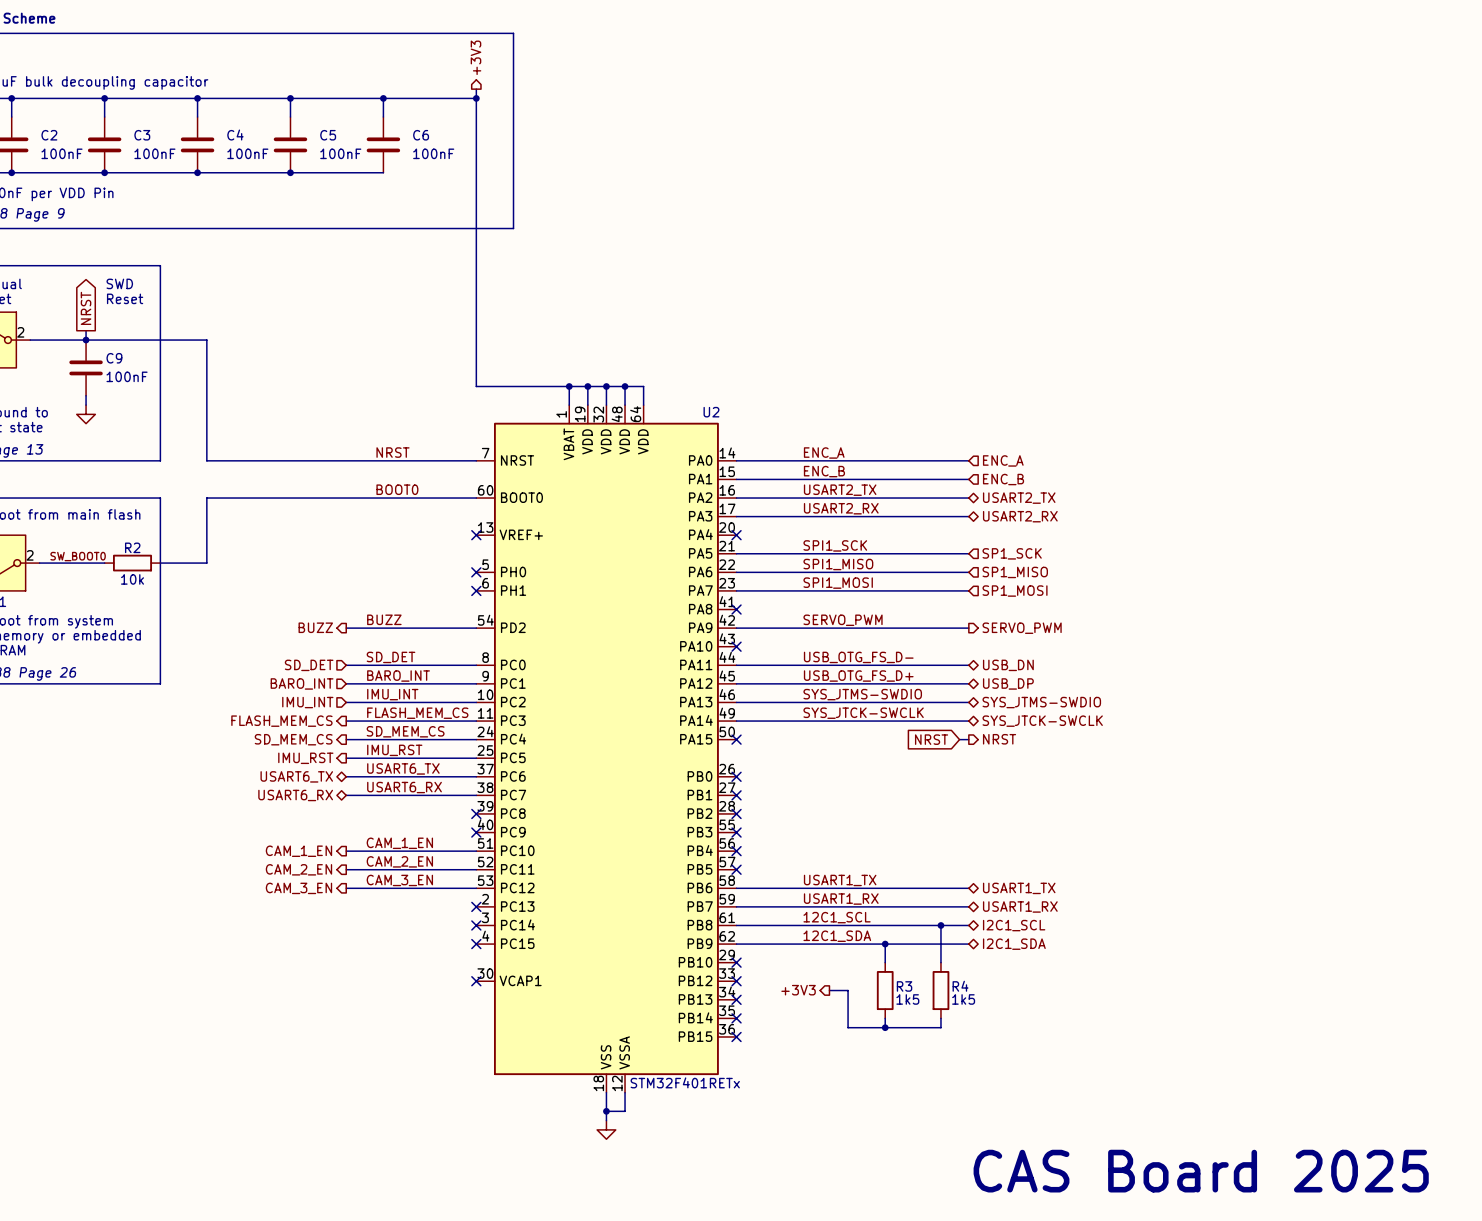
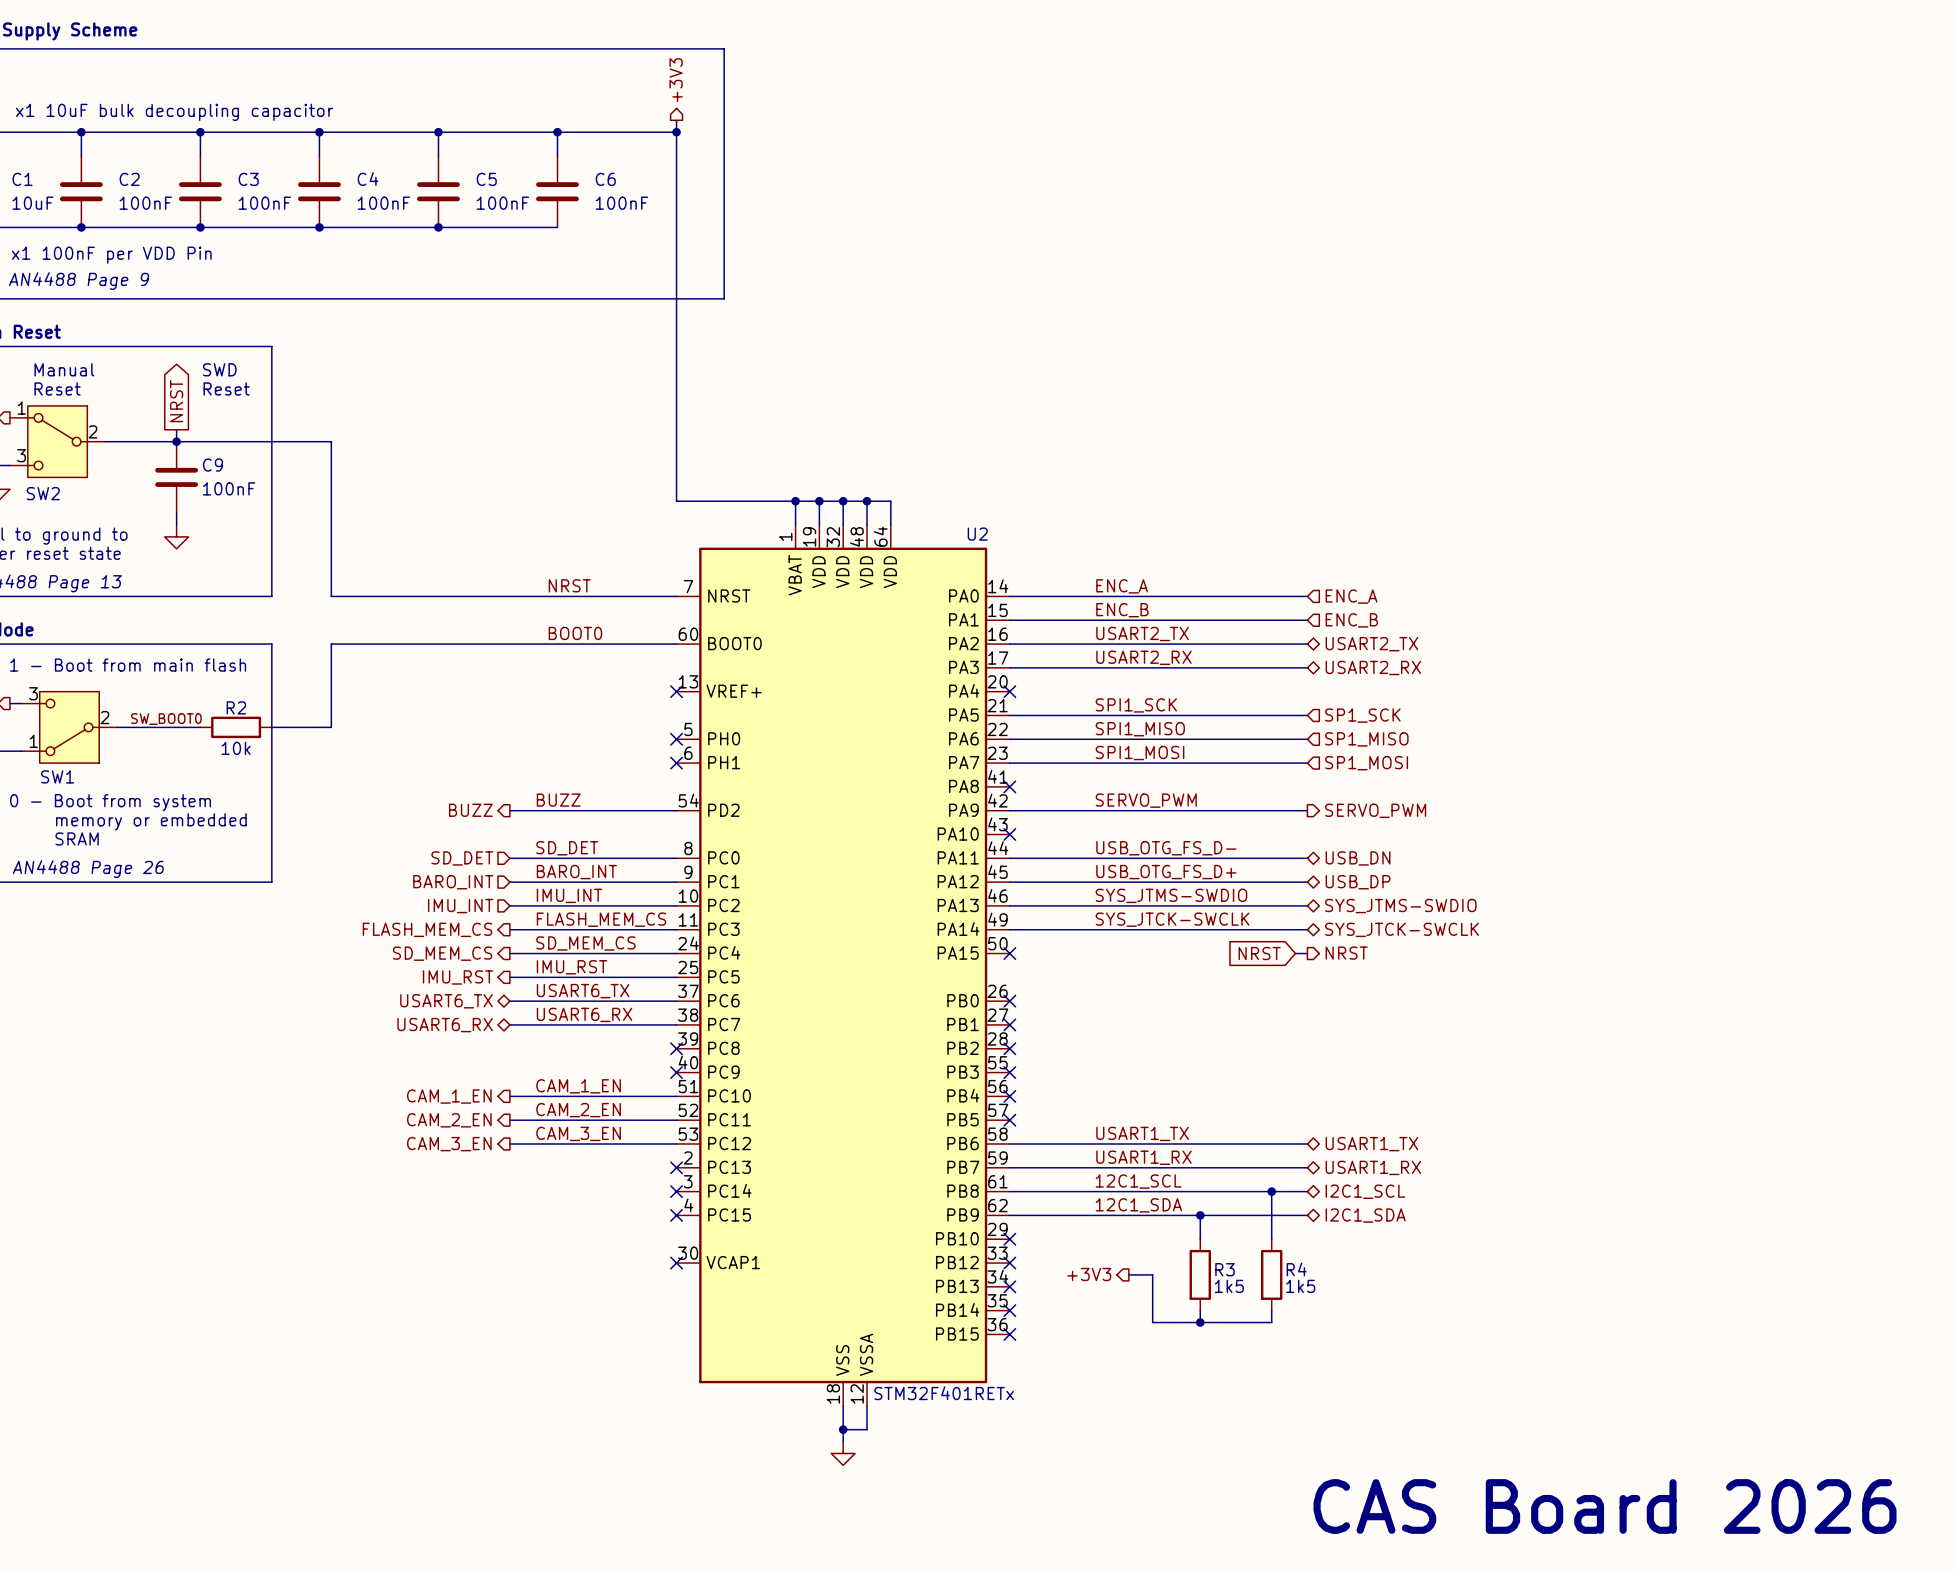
text: CAS Board 2025 (1201, 1171) -> CAS Board 2026 (1604, 1506)

